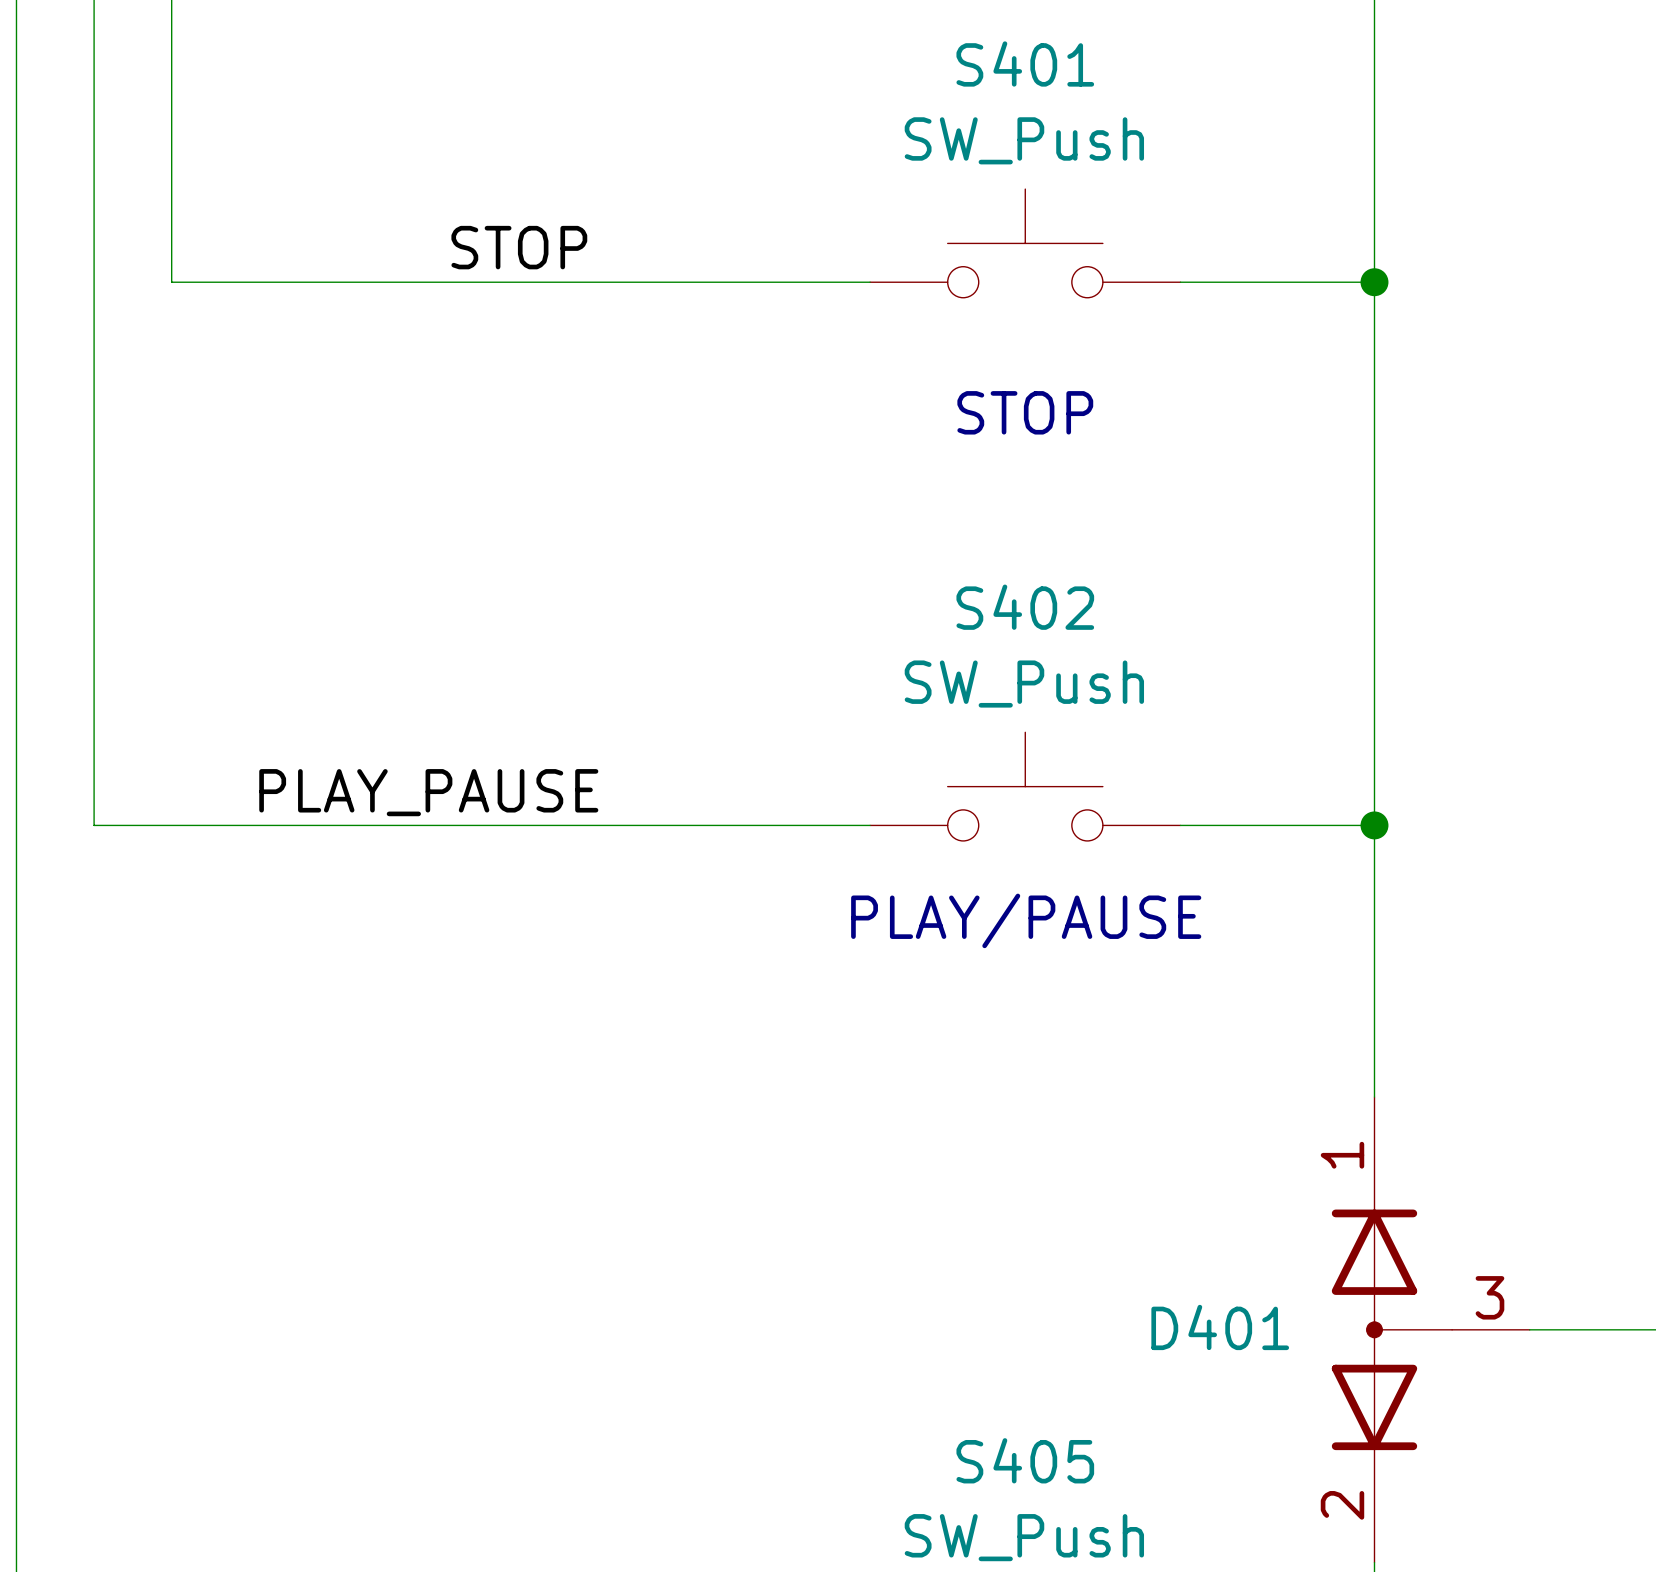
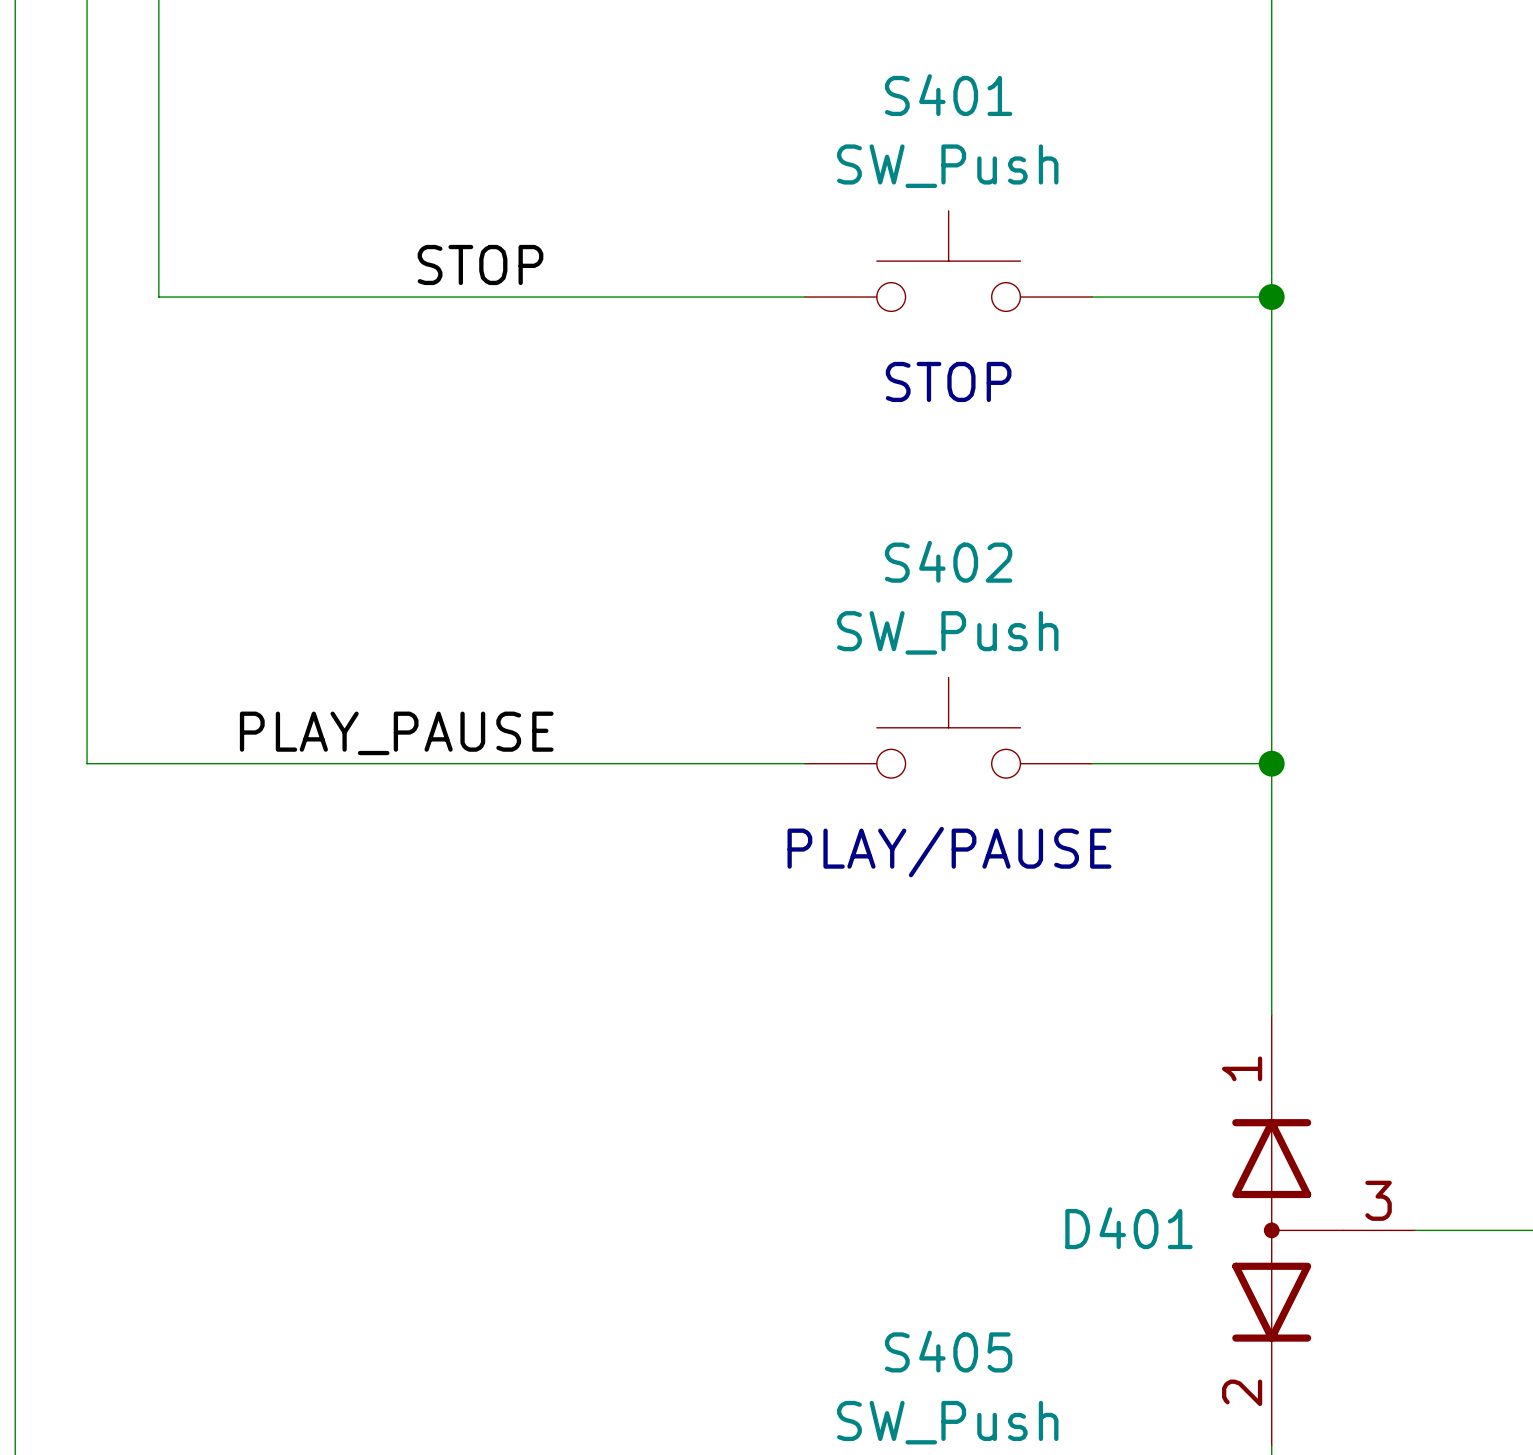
S401 position: (1025, 243) -> (948, 261)
label position: STOP (519, 247) -> STOP (480, 264)
wire: (171, 282) (870, 282) -> (158, 261) (158, 297) (805, 297)
wire: (1180, 282) (1374, 282) -> (1092, 297) (1271, 297)
junction position: (1374, 282) -> (1271, 297)

